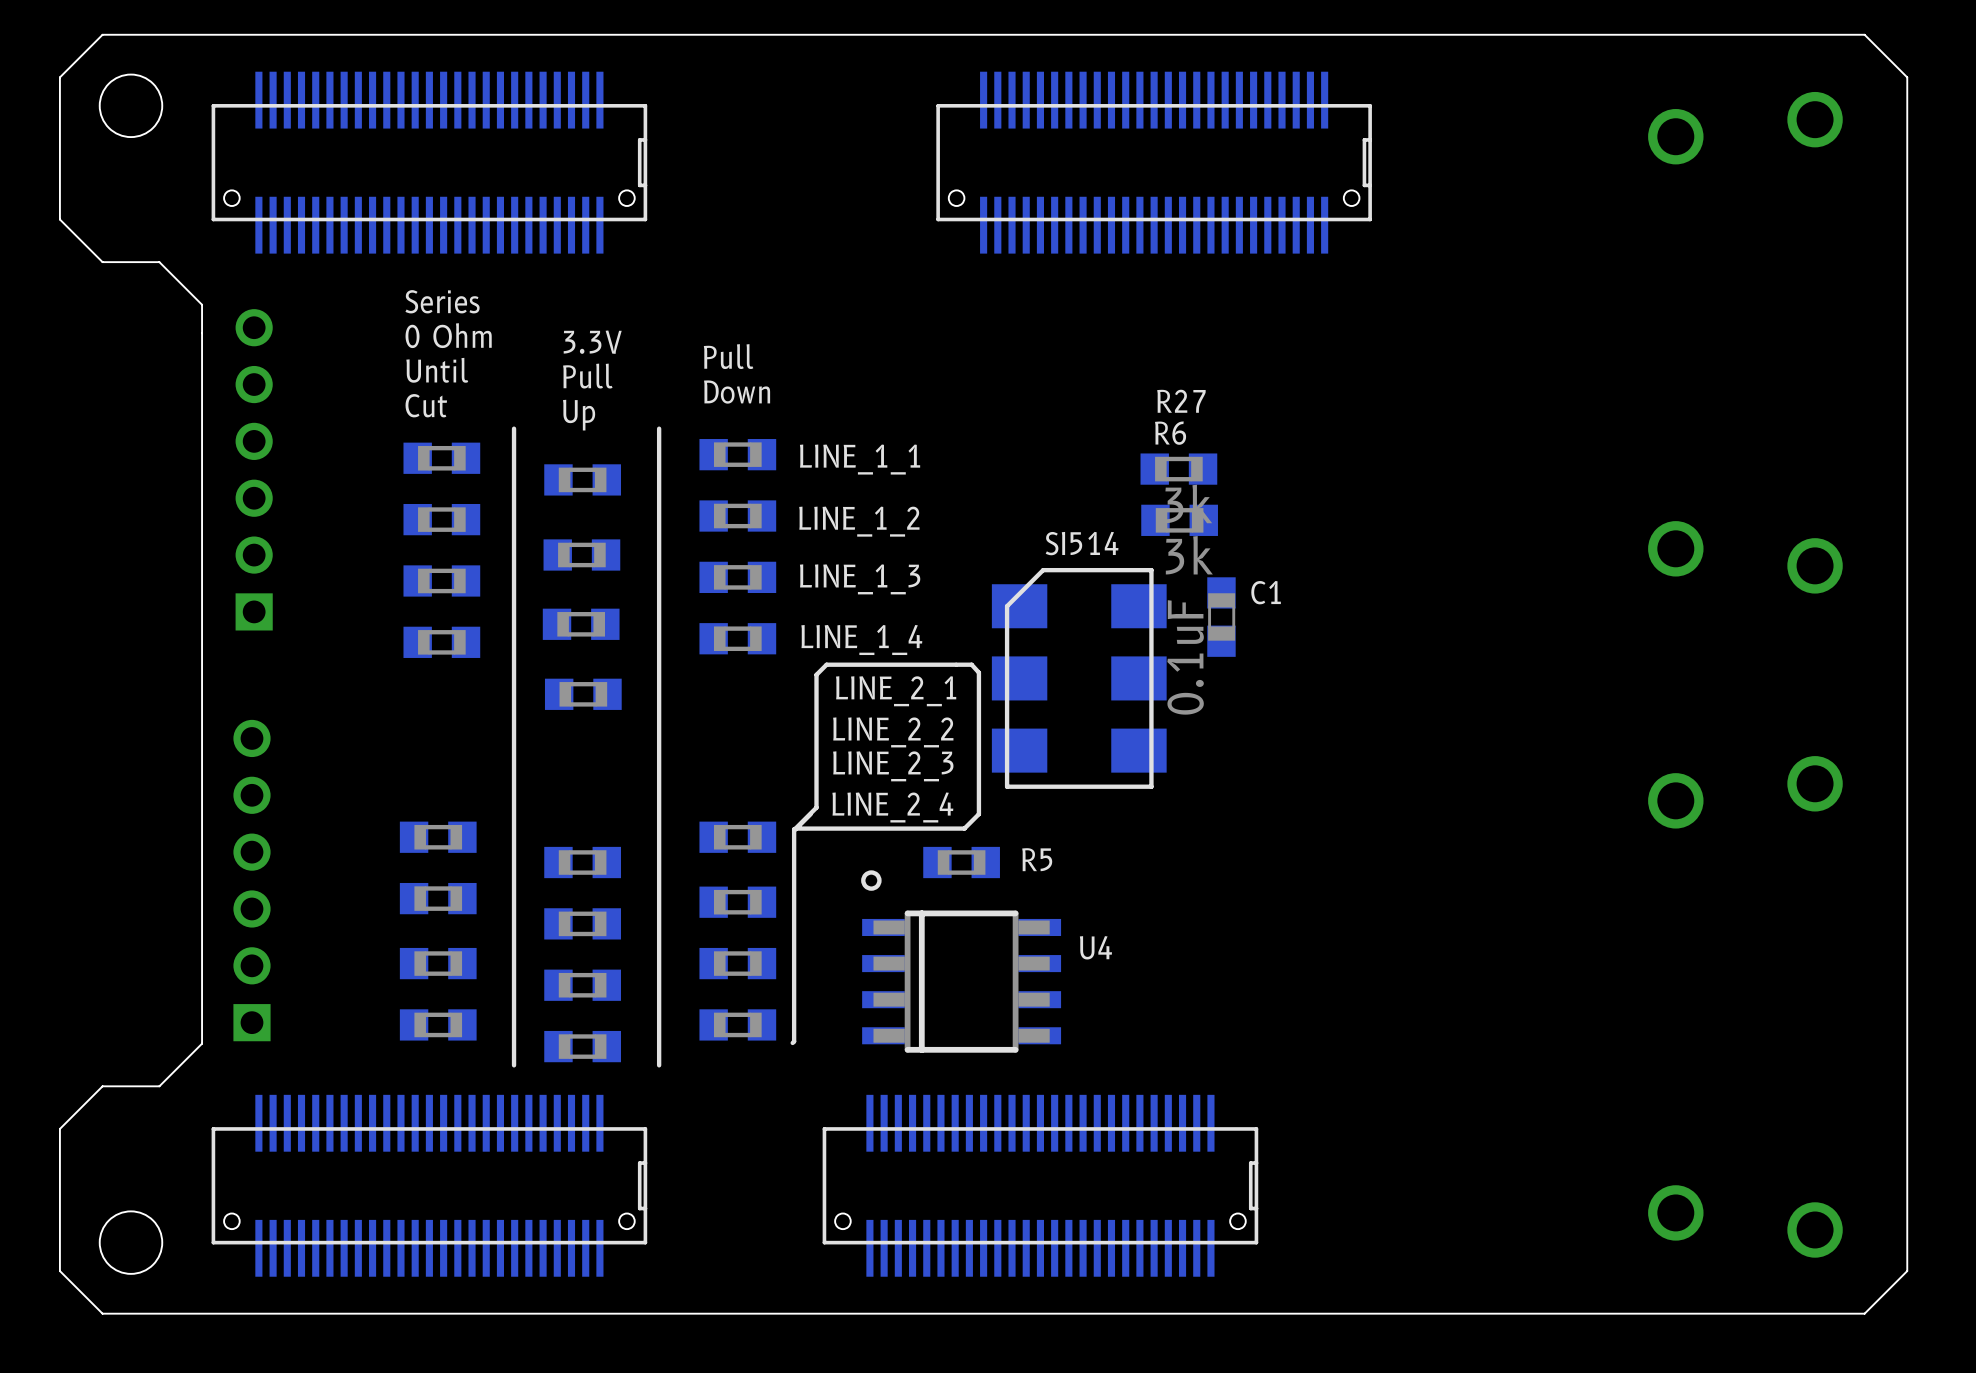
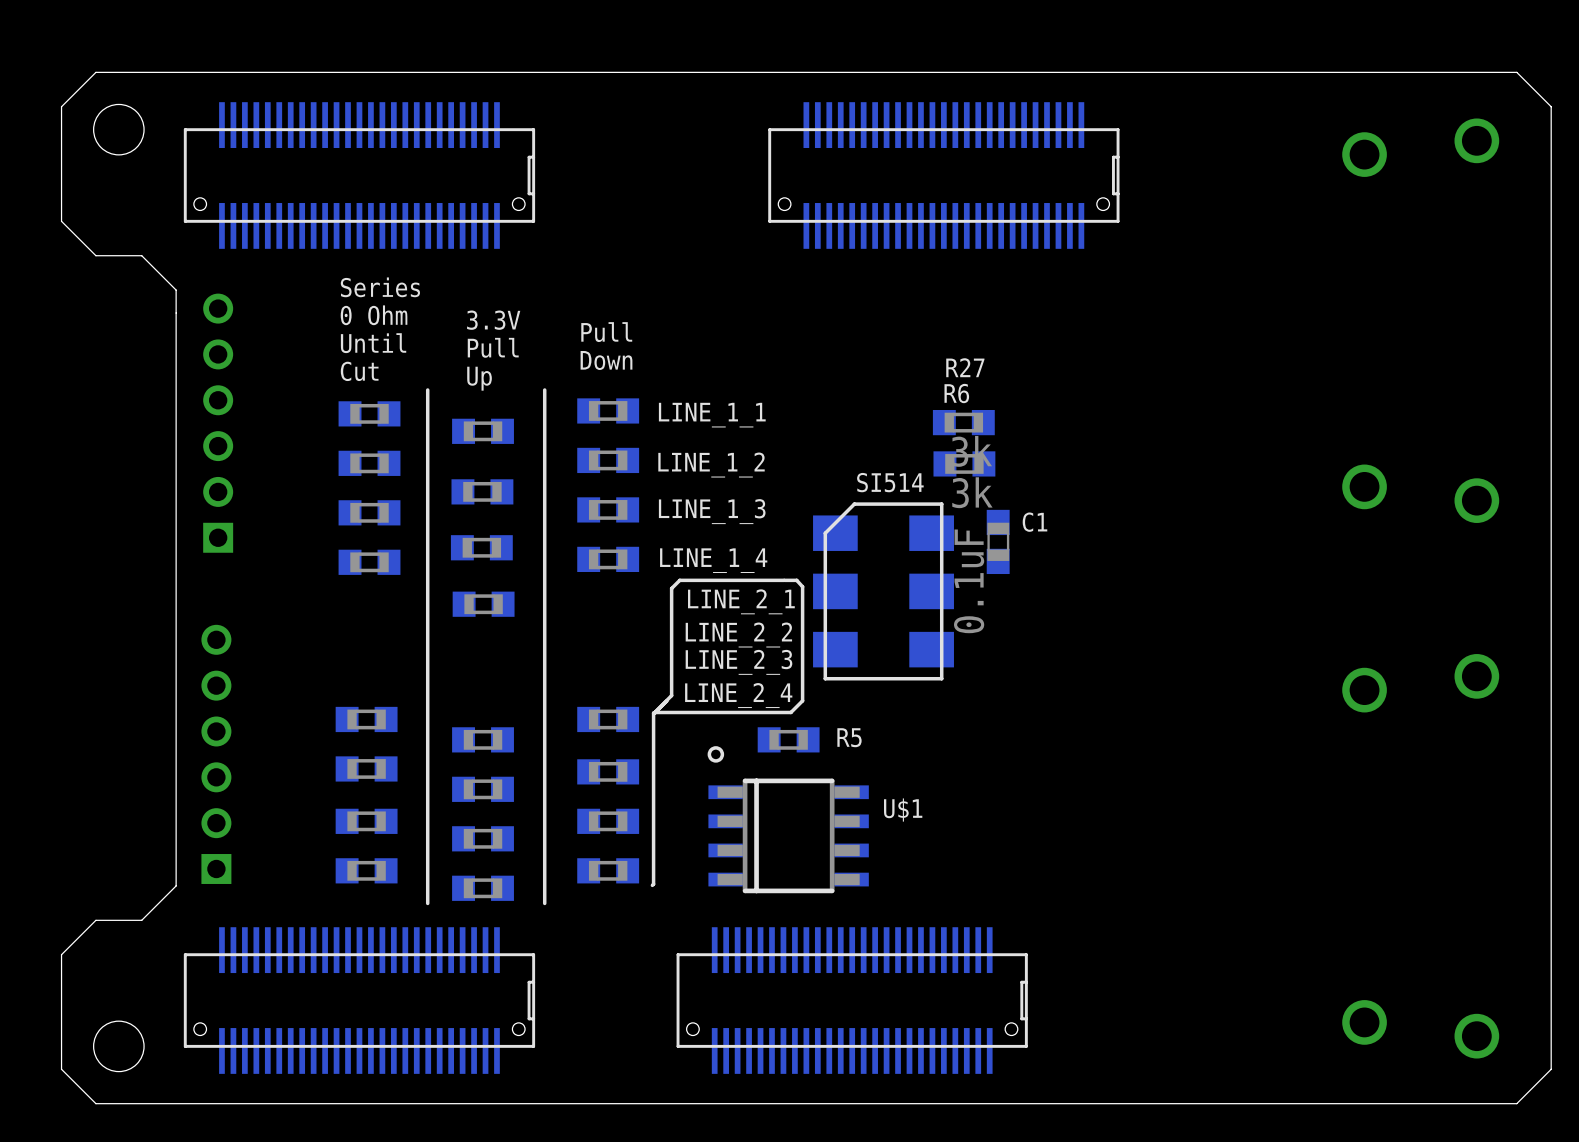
U4 name: U4 (1095, 947) -> U$1 (903, 810)

